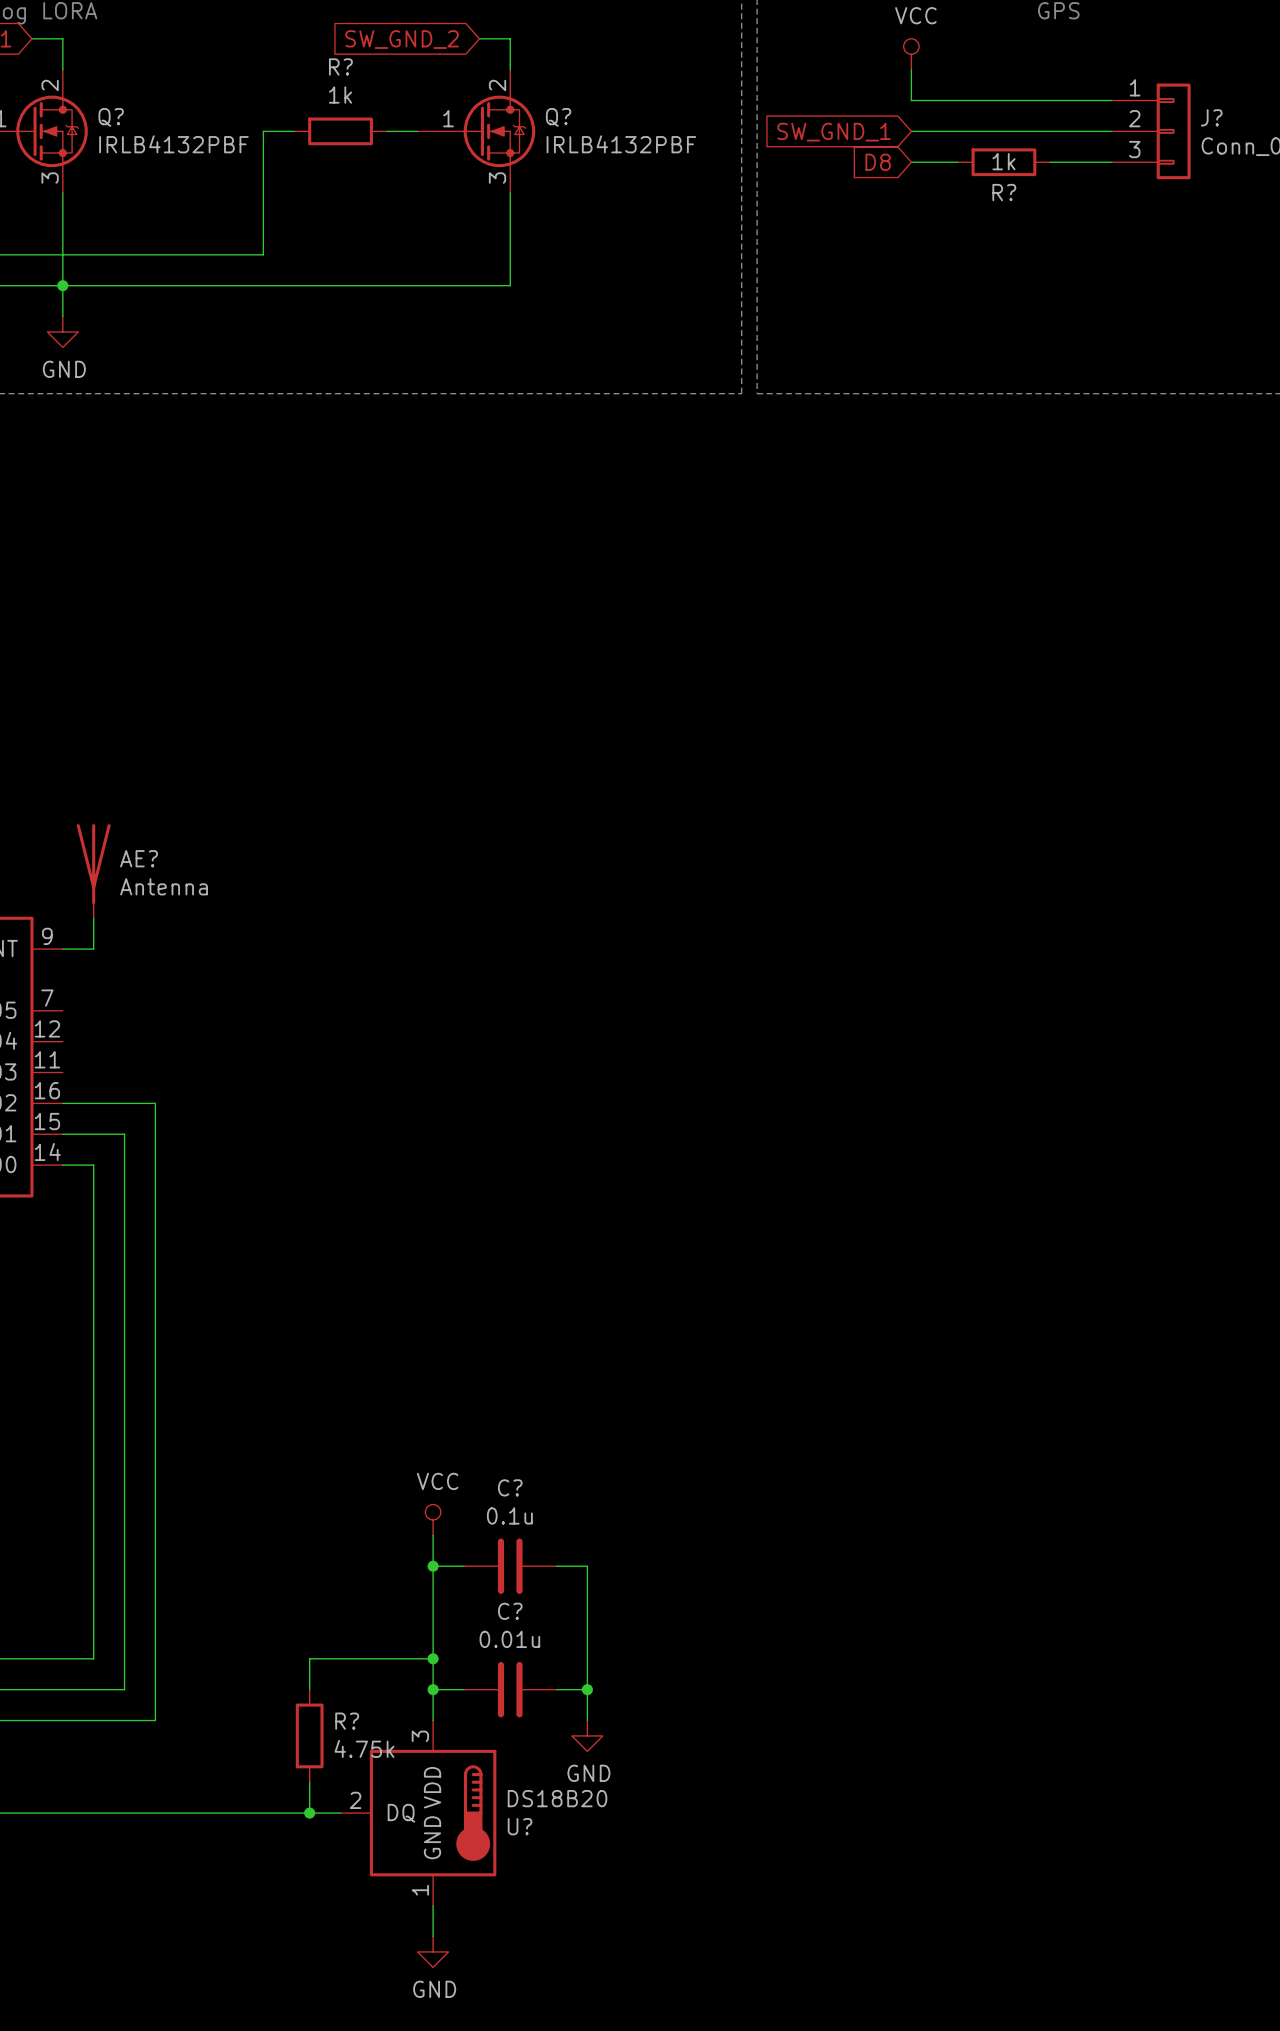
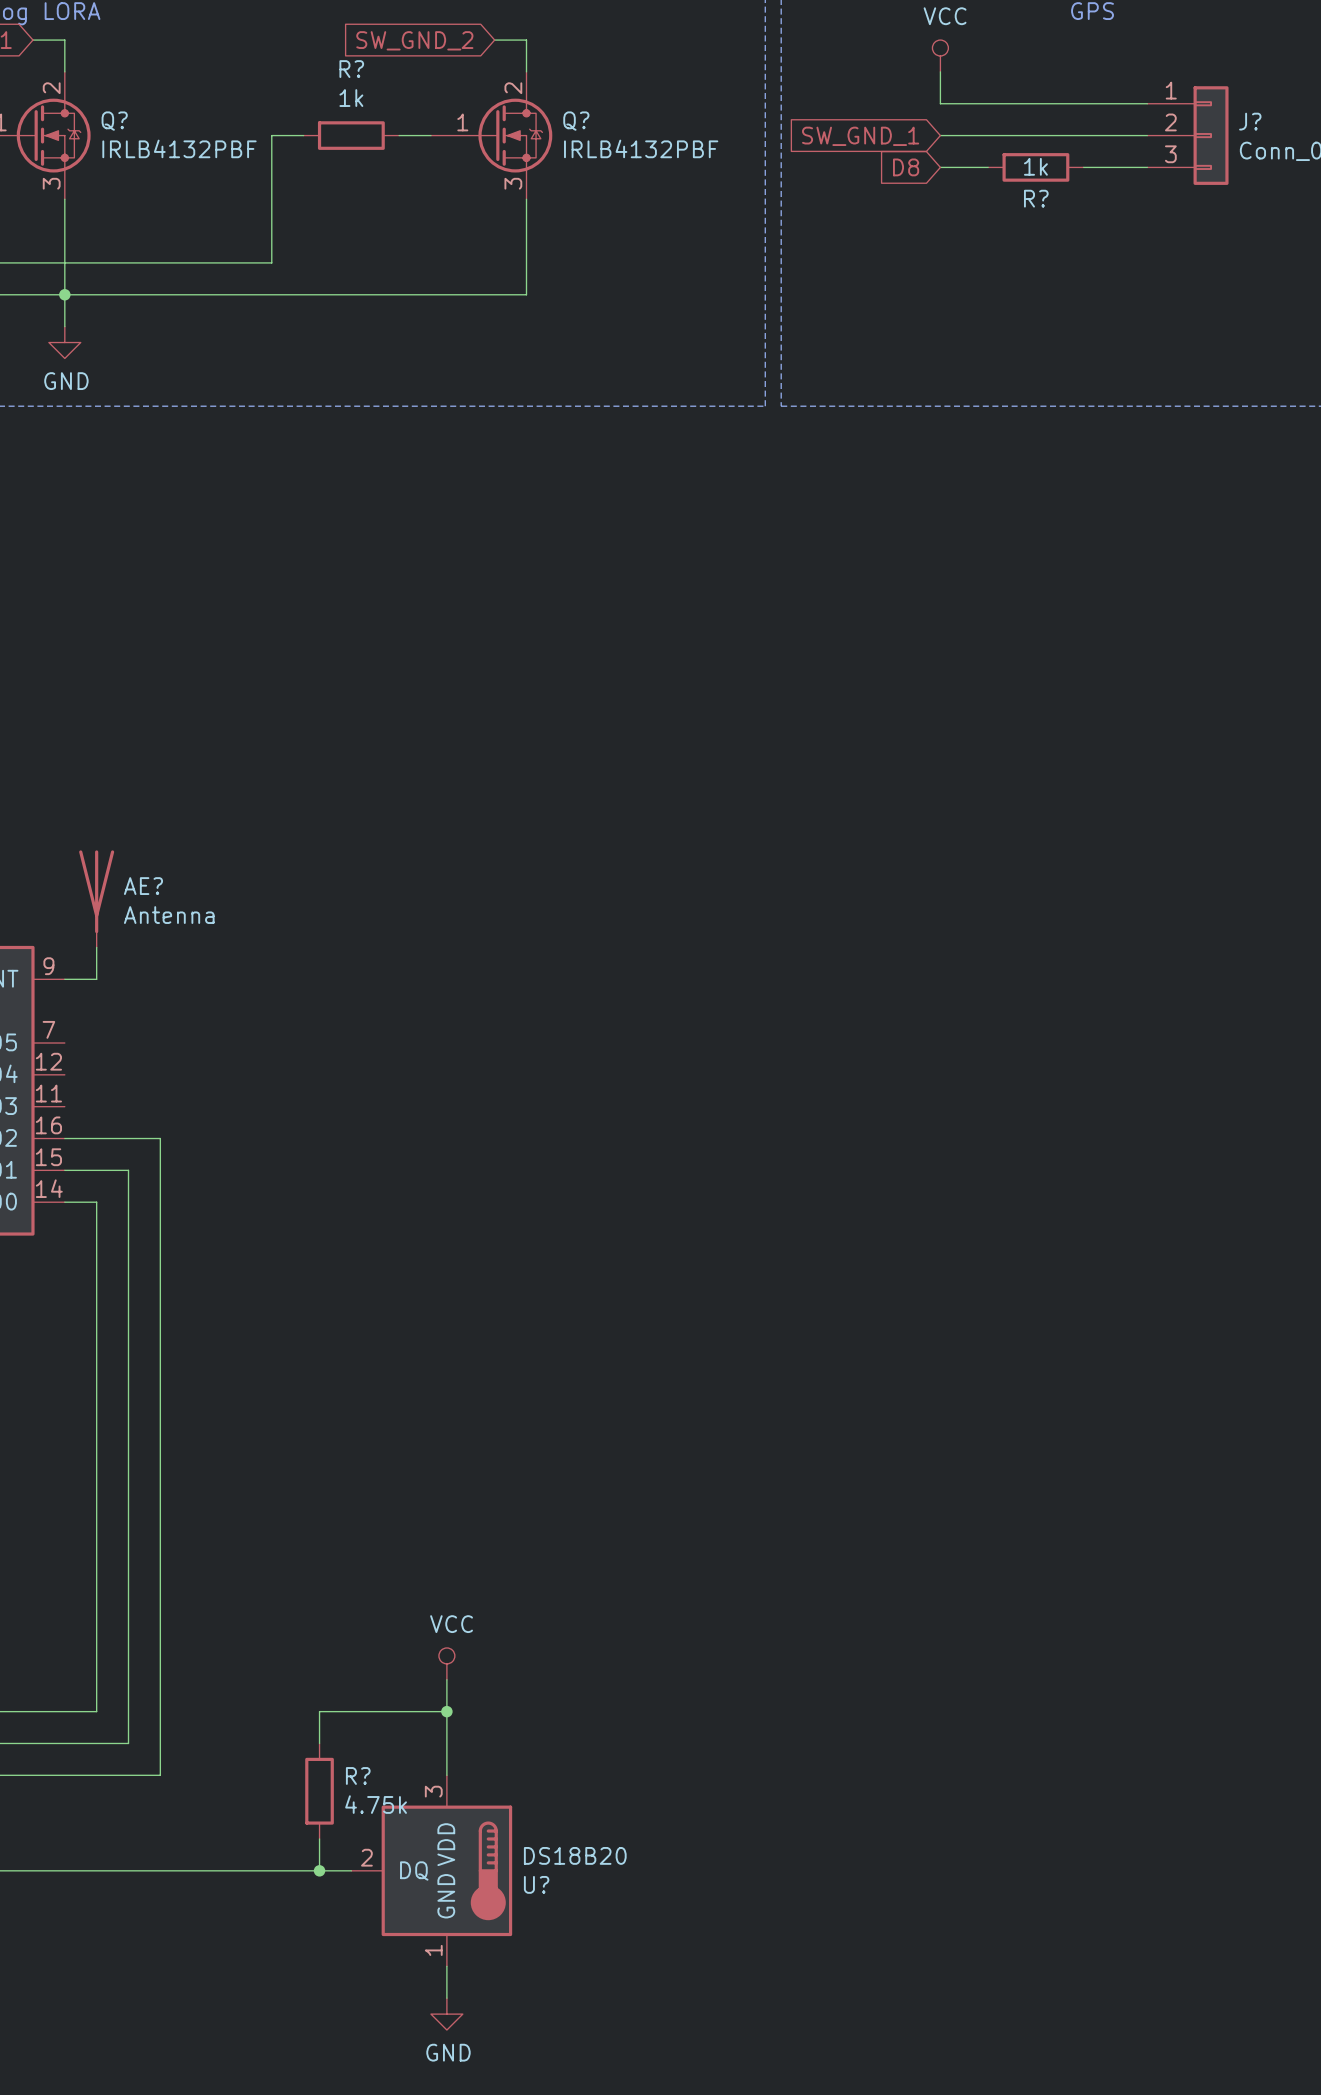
power symbol position: VCC (433, 1519) -> VCC (446, 1663)
wire: (433, 1535) (433, 1627) -> none
wire: (433, 1566) (463, 1566) -> none
junction: (433, 1566) -> none
C?: 0.1u (510, 1566) -> none
wire: (556, 1566) (587, 1566) (587, 1720) -> none
wire: (433, 1689) (463, 1689) -> none
junction: (433, 1689) -> none
C?: 0.01u (510, 1689) -> none
wire: (556, 1689) (587, 1689) -> none
junction: (587, 1689) -> none
power symbol: GND (587, 1735) -> none

